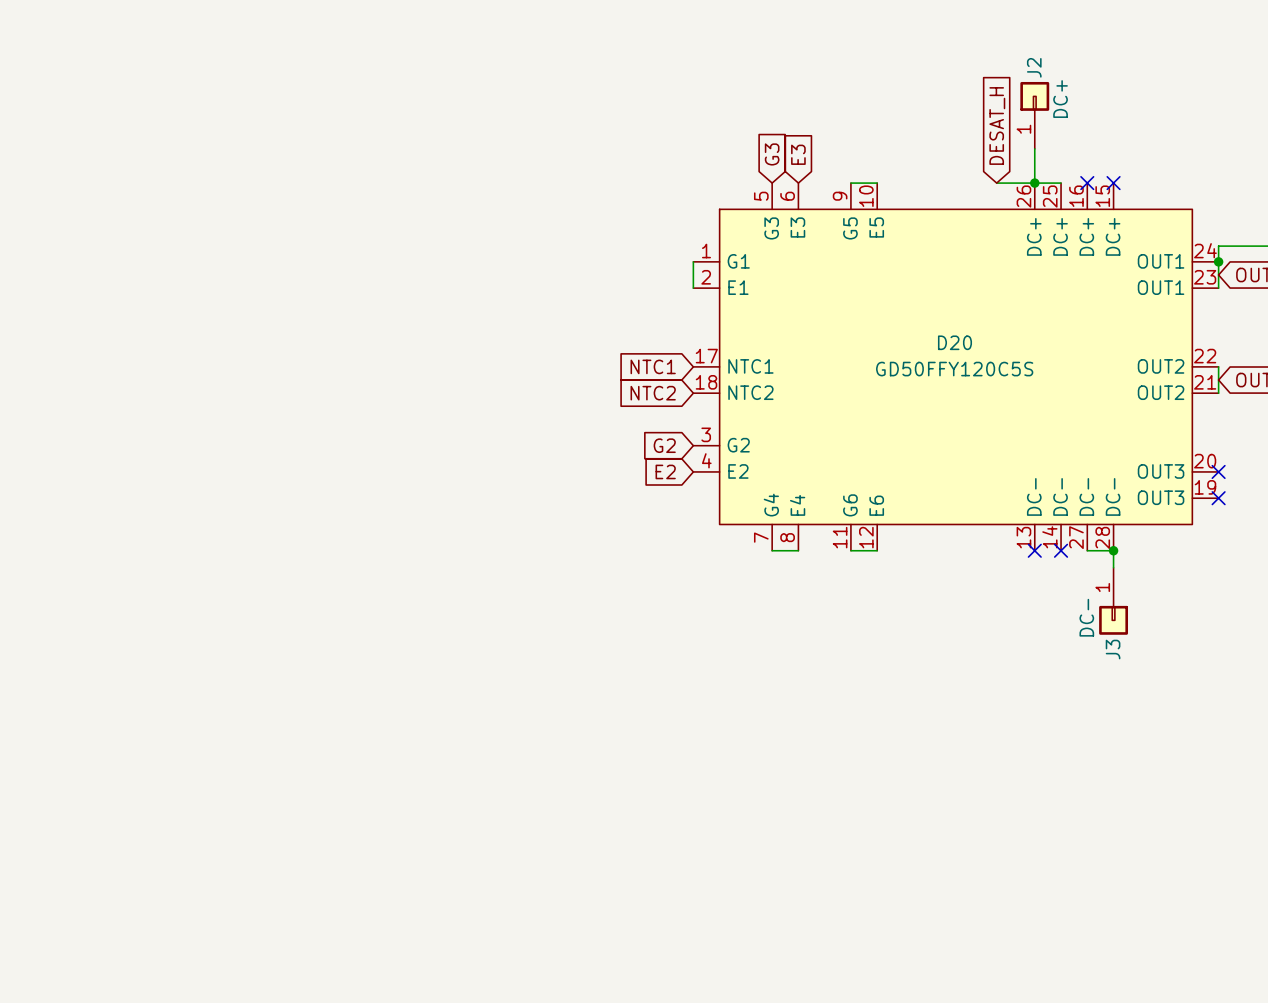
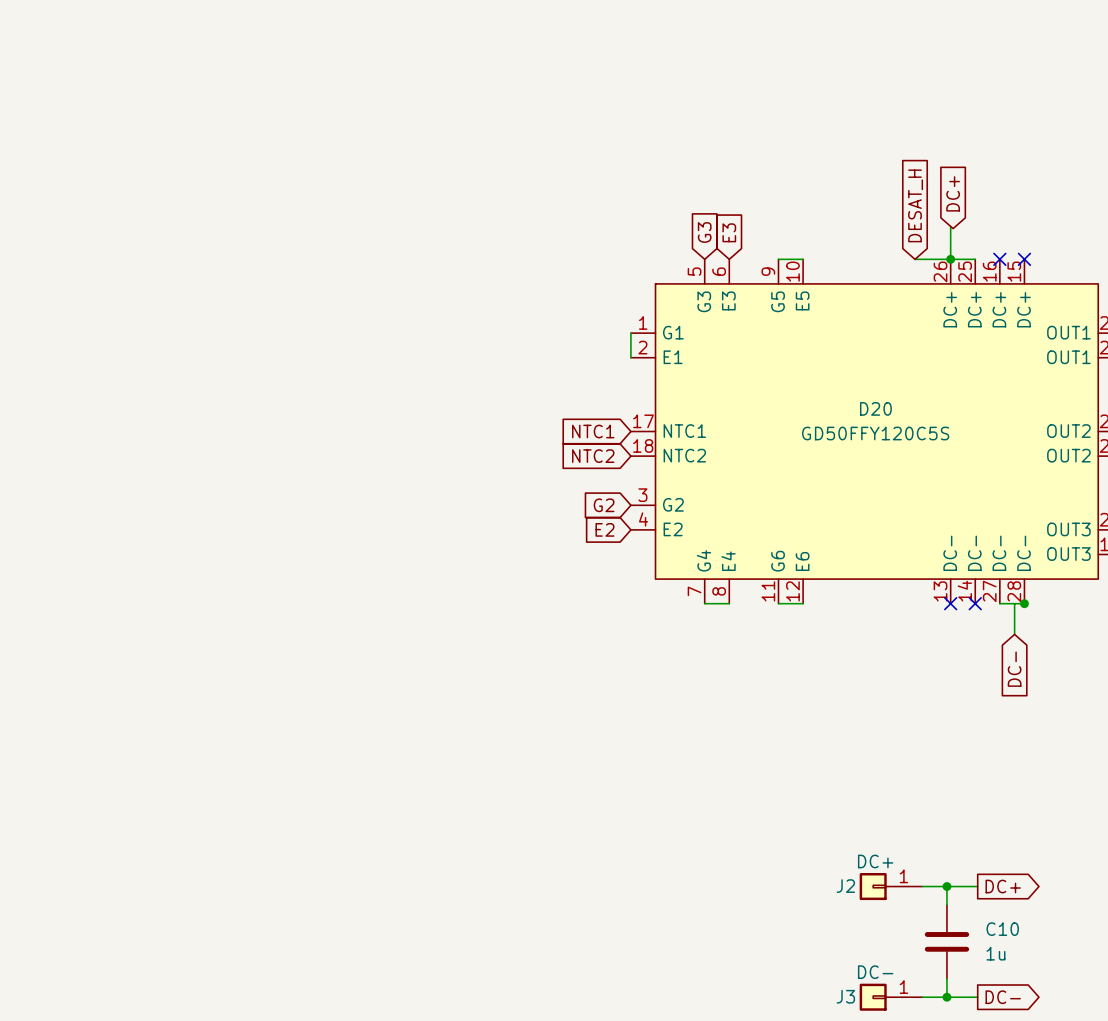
J2 rotation: 0° (1034, 96) -> 90° counterclockwise (873, 886)
global label: none -> DC+ (953, 193)
J2 position: (1034, 115) -> (891, 886)
wire: none -> (1014, 603) (1014, 634)
wire: (1113, 550) (1113, 567) -> none
J3 position: (1113, 601) -> (891, 997)
global label: none -> DC- (1014, 669)
J3 rotation: 0° (1113, 620) -> 90° clockwise (873, 997)
wire: none -> (922, 886) (977, 886)
wire: none -> (946, 886) (946, 904)
junction: none -> (946, 886)
global label: none -> DC+ (1003, 886)
C10: none -> 1u (946, 941)
wire: none -> (946, 978) (946, 997)
wire: none -> (922, 997) (977, 997)
junction: none -> (946, 997)
global label: none -> DC- (1003, 997)

